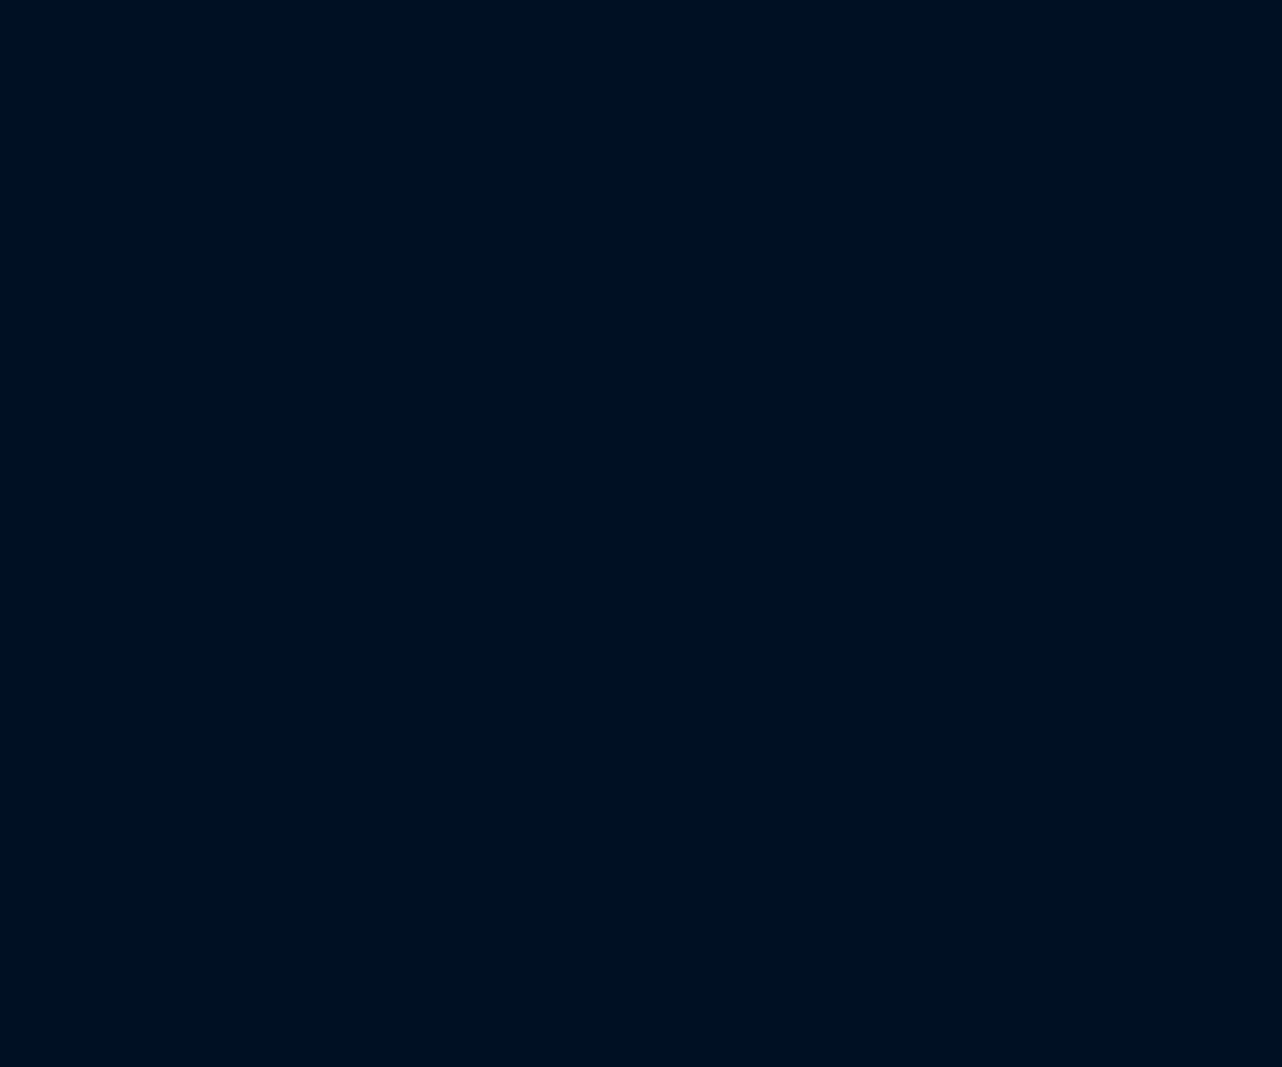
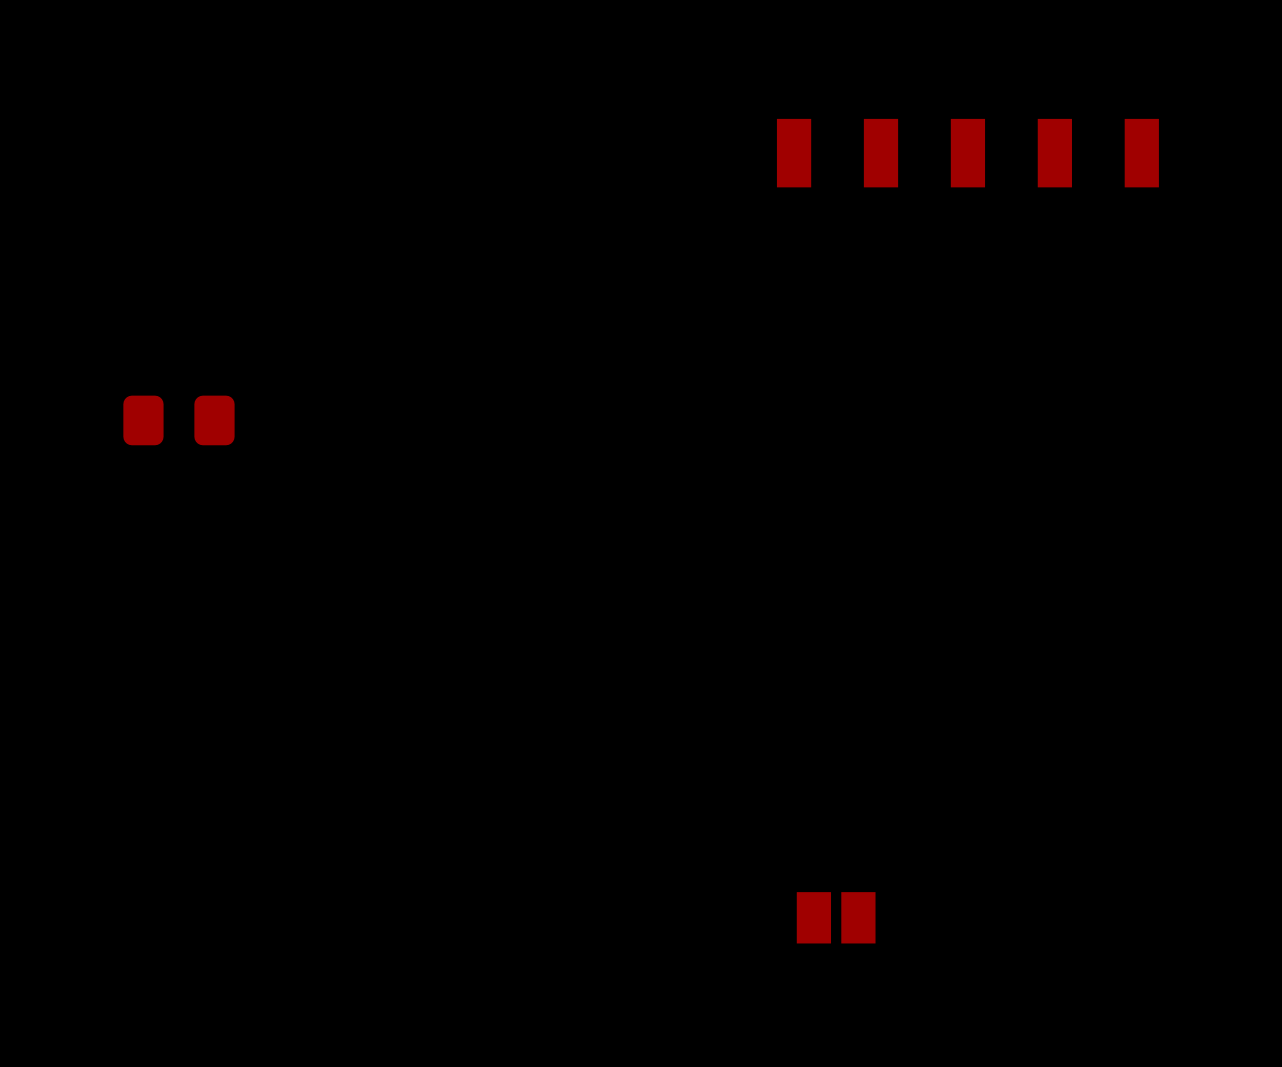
part: none -> (967, 153)
part: none -> (178, 420)
part: none -> (836, 917)

